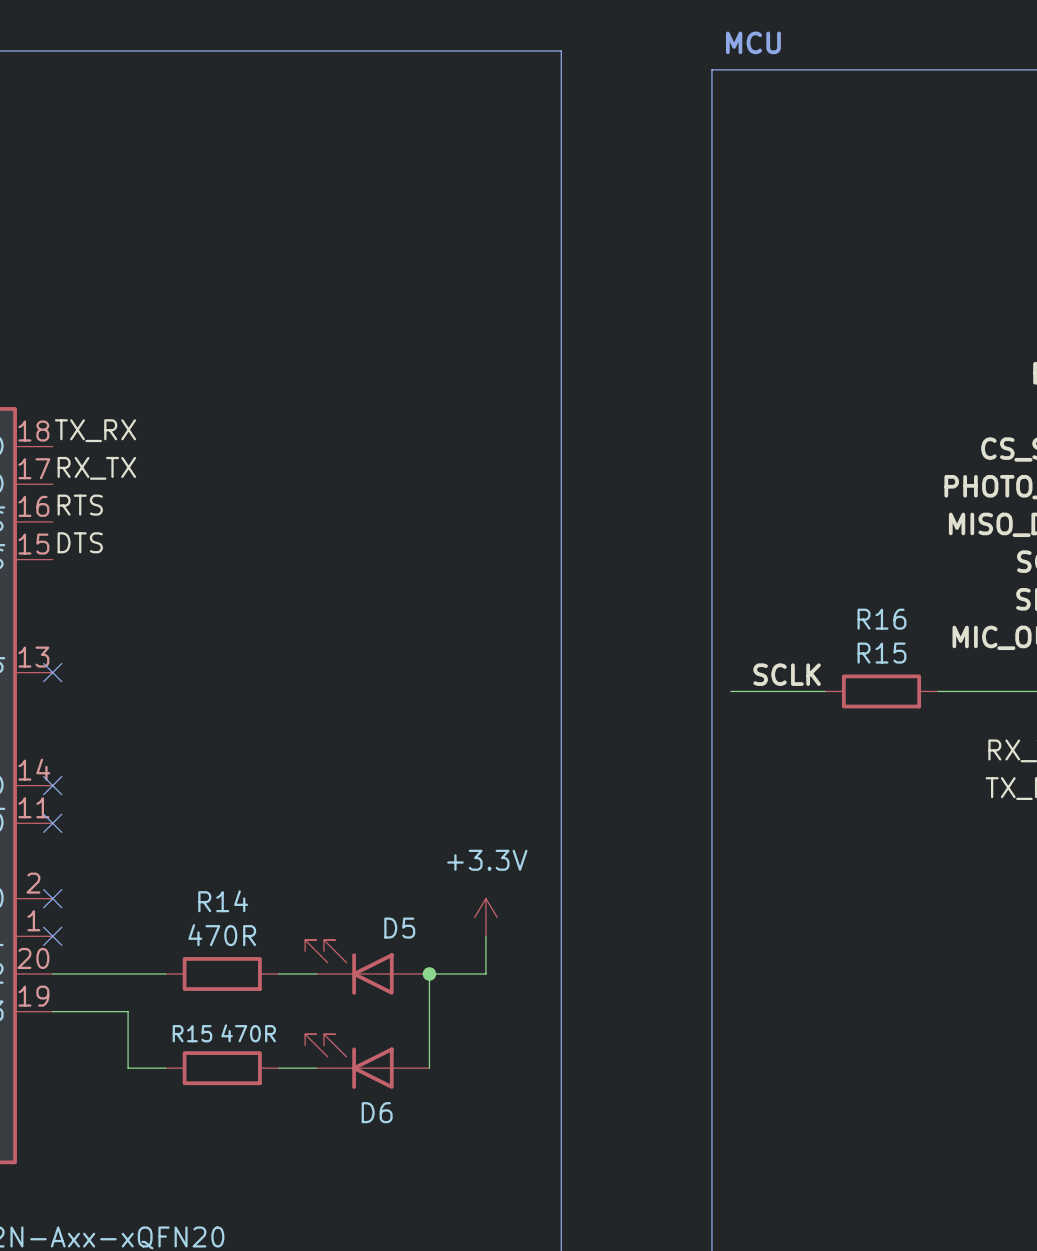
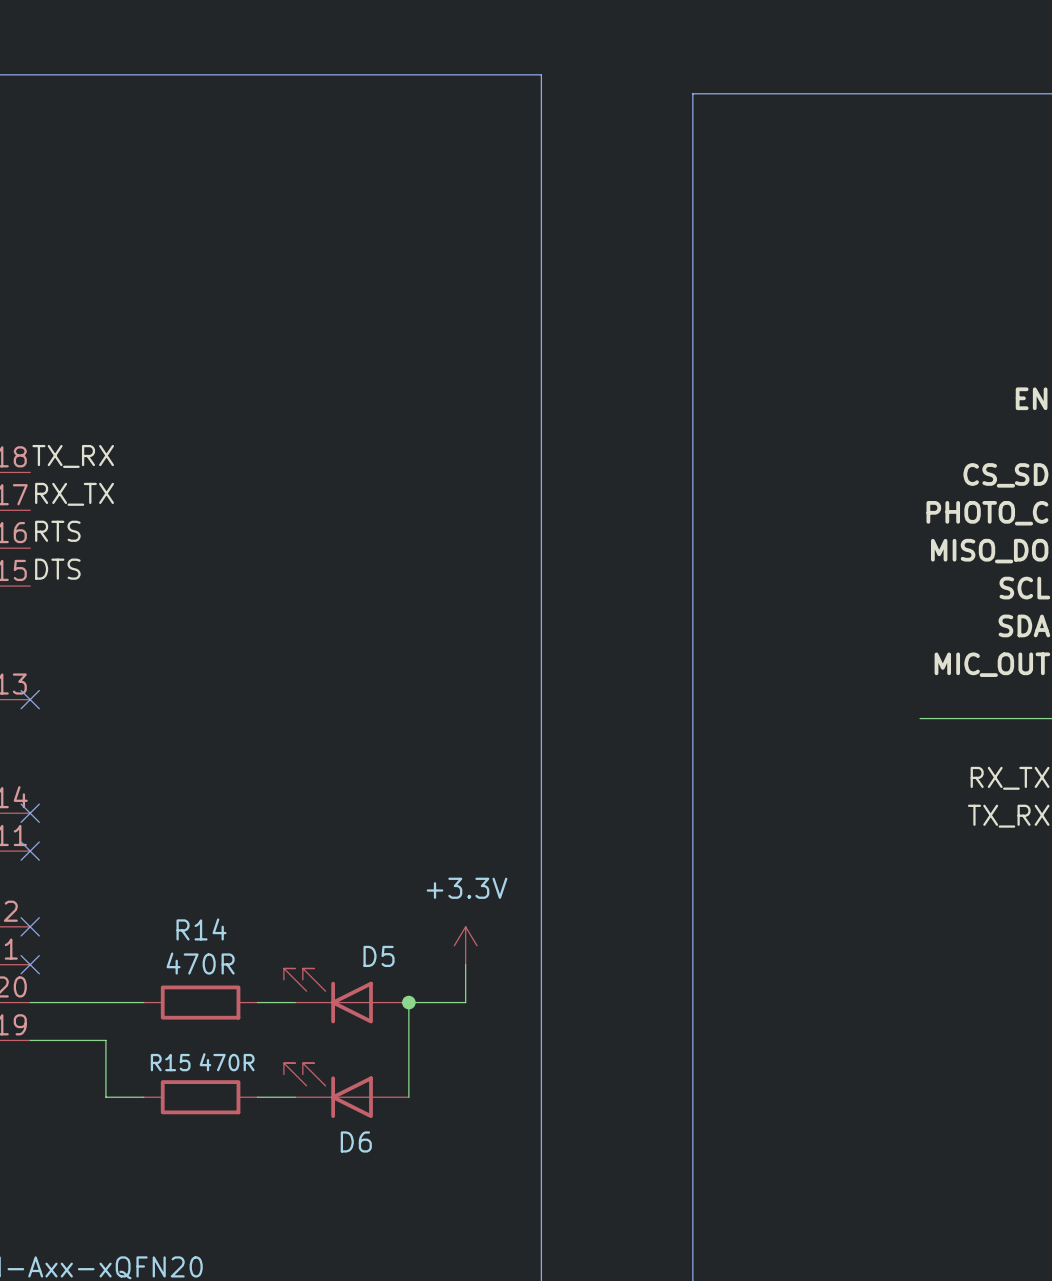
text: MCU (753, 42) -> none
label: SCLK (787, 674) -> none
wire: (730, 691) (824, 691) -> none
R16: R15 (881, 691) -> none

